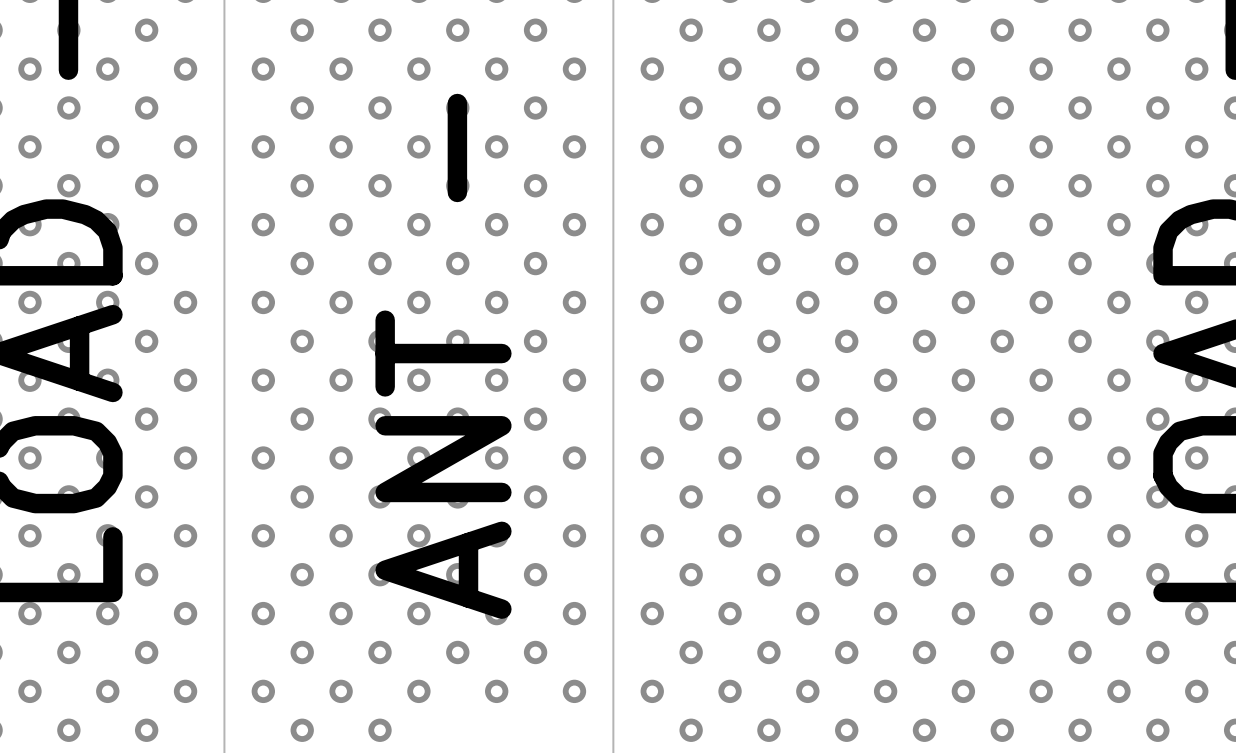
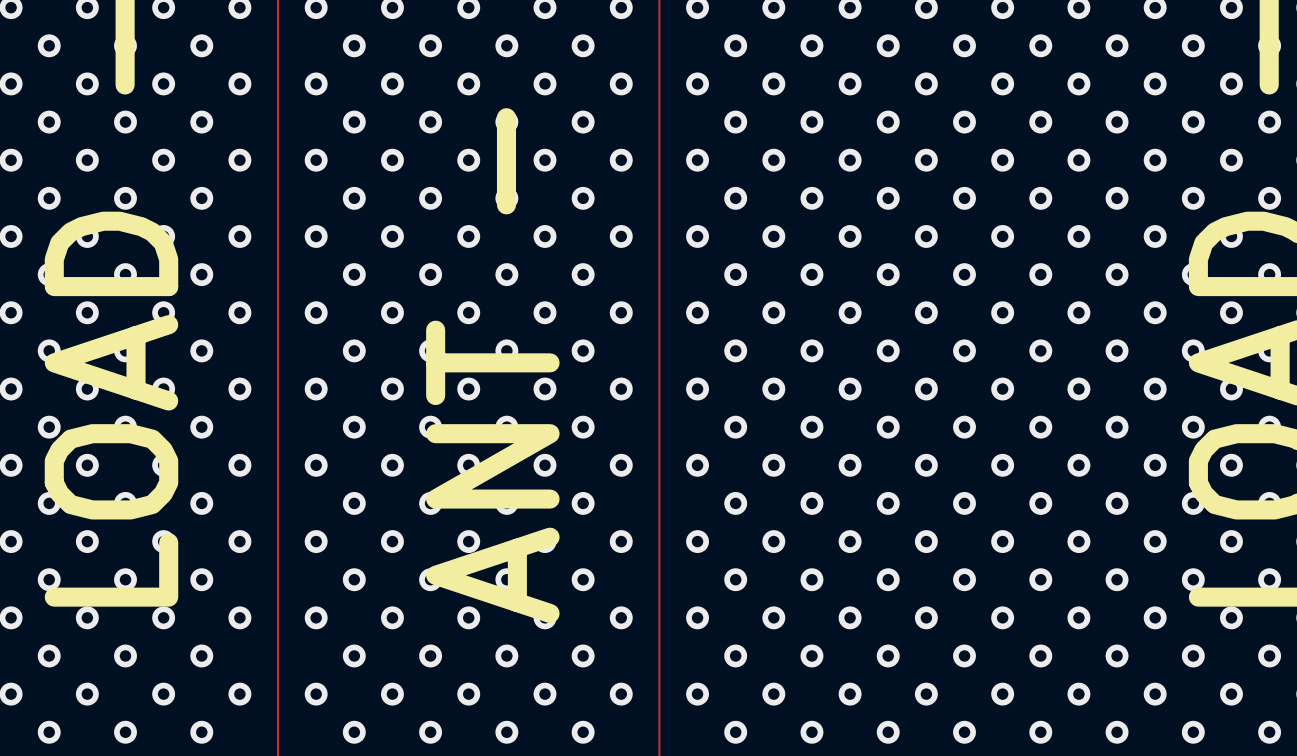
via: none -> (506, 732)
via: none -> (583, 732)

